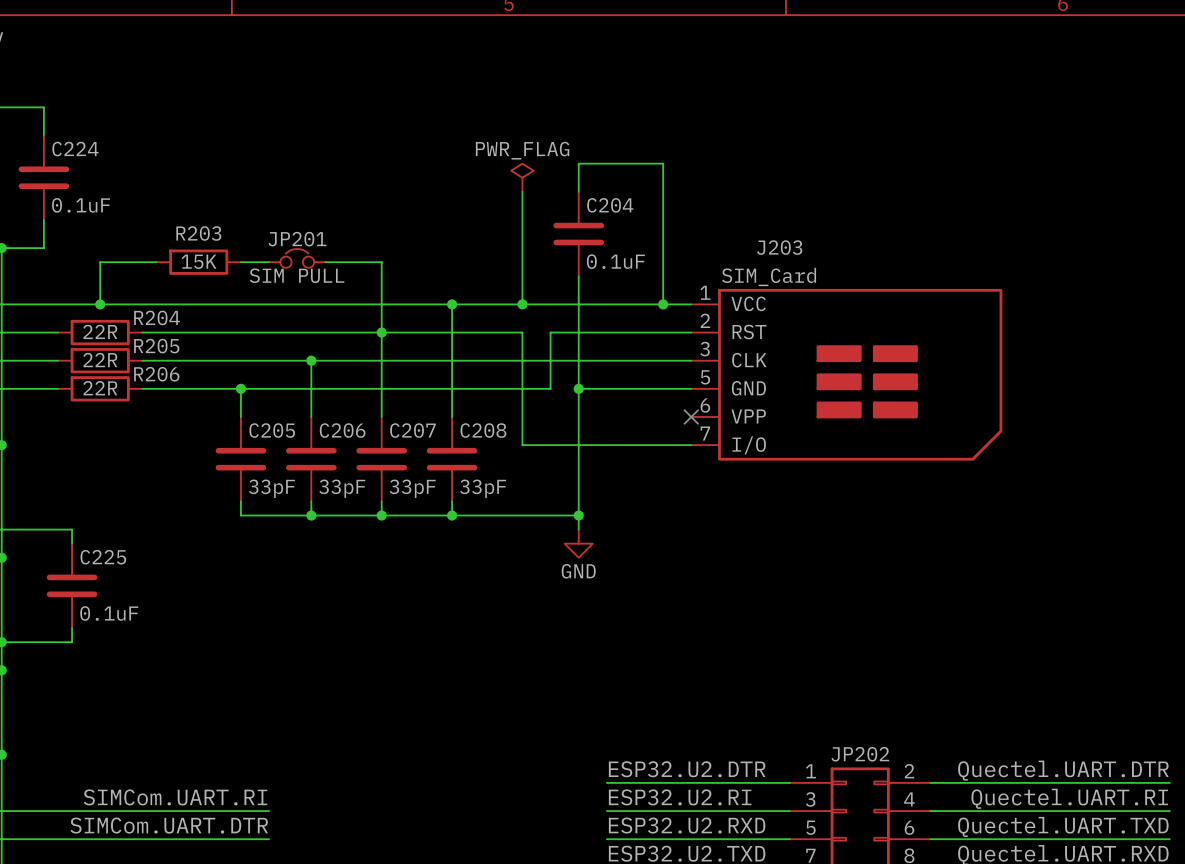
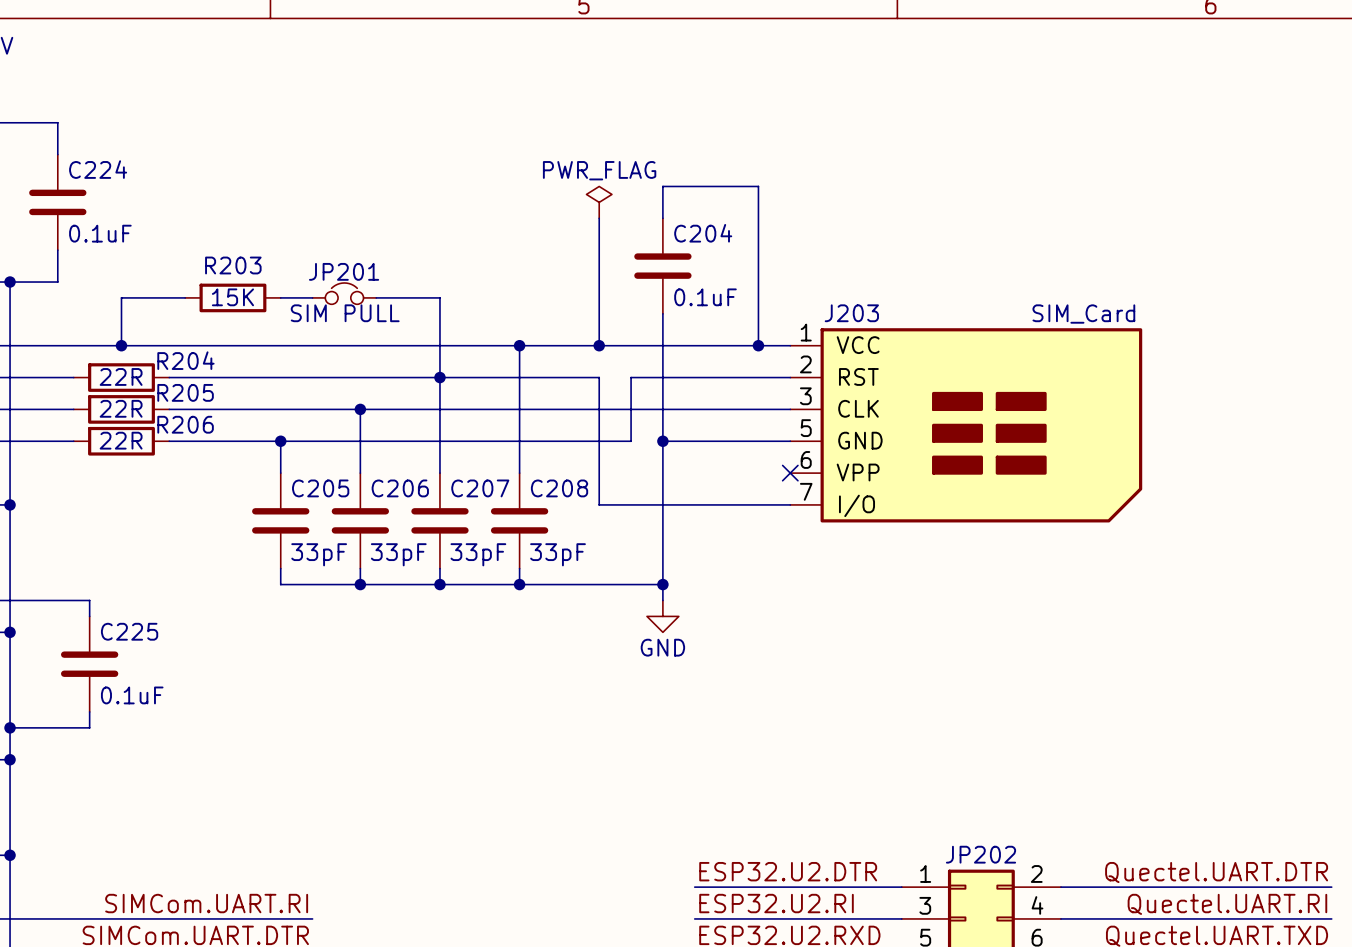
J203 name position: J203 (779, 247) -> J203 (851, 313)
J203 value position: SIM_Card (769, 277) -> SIM_Card (1083, 314)

